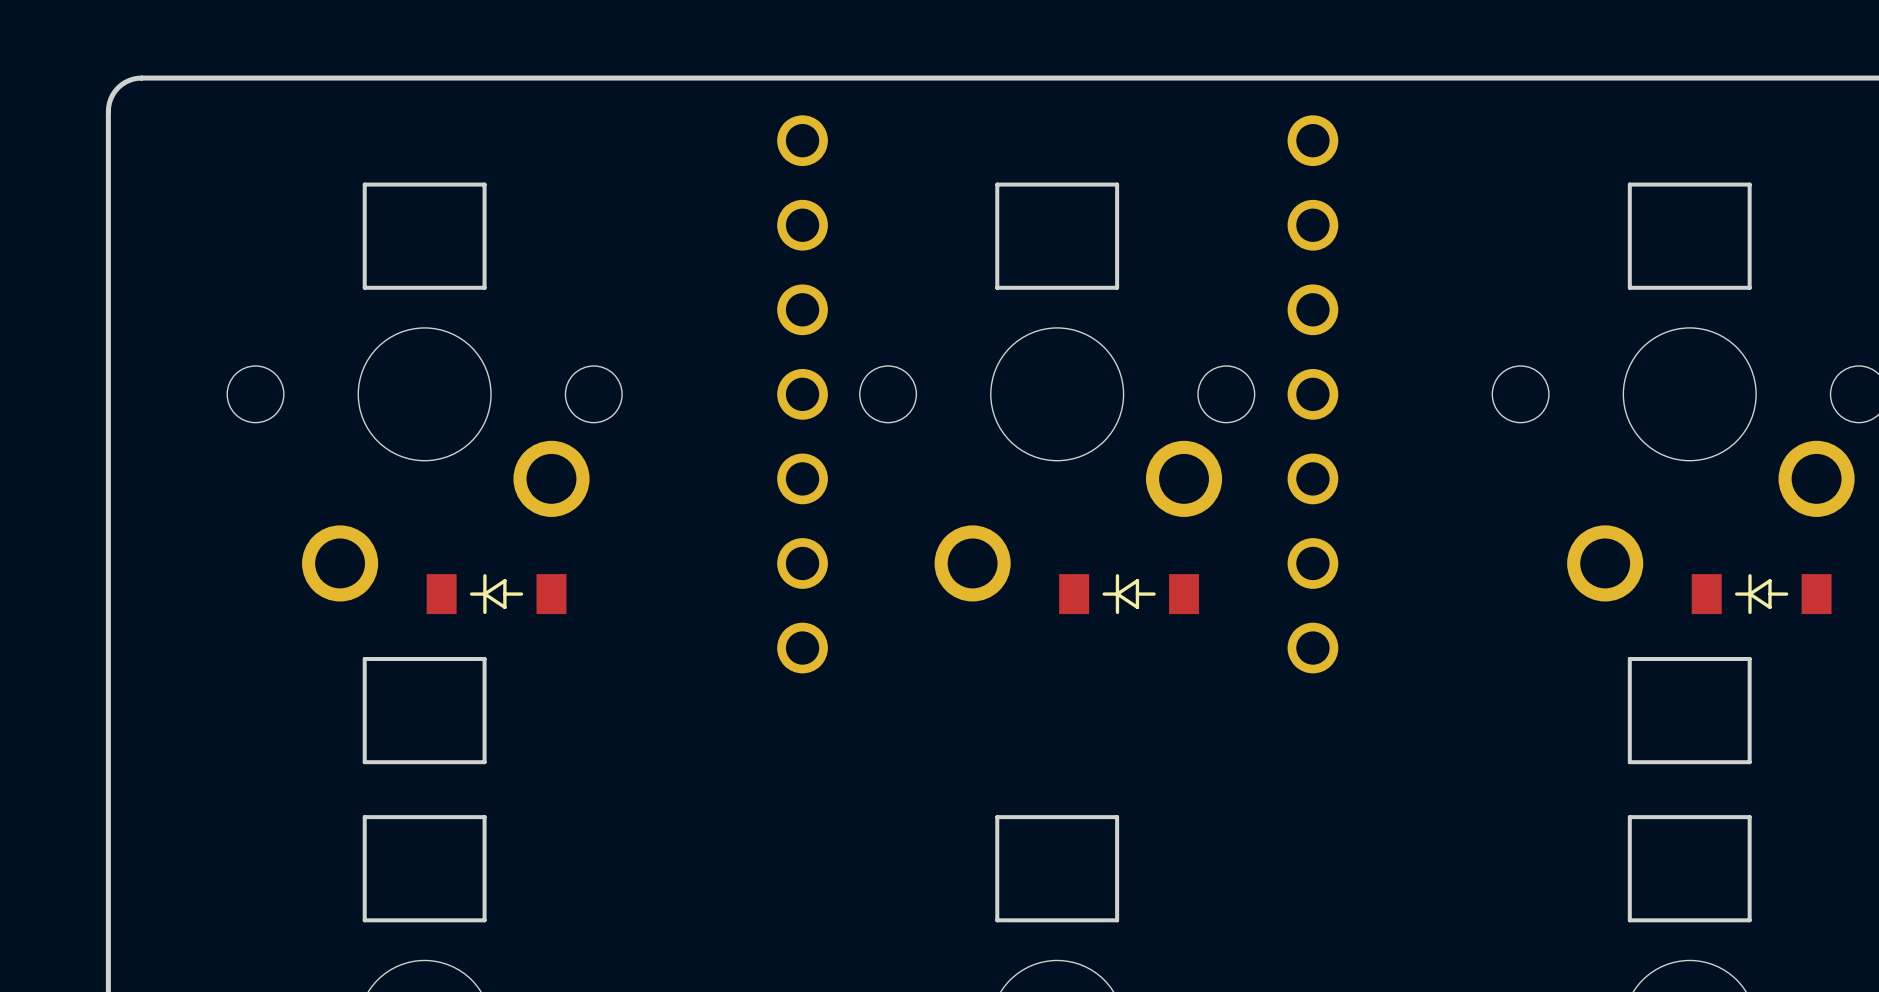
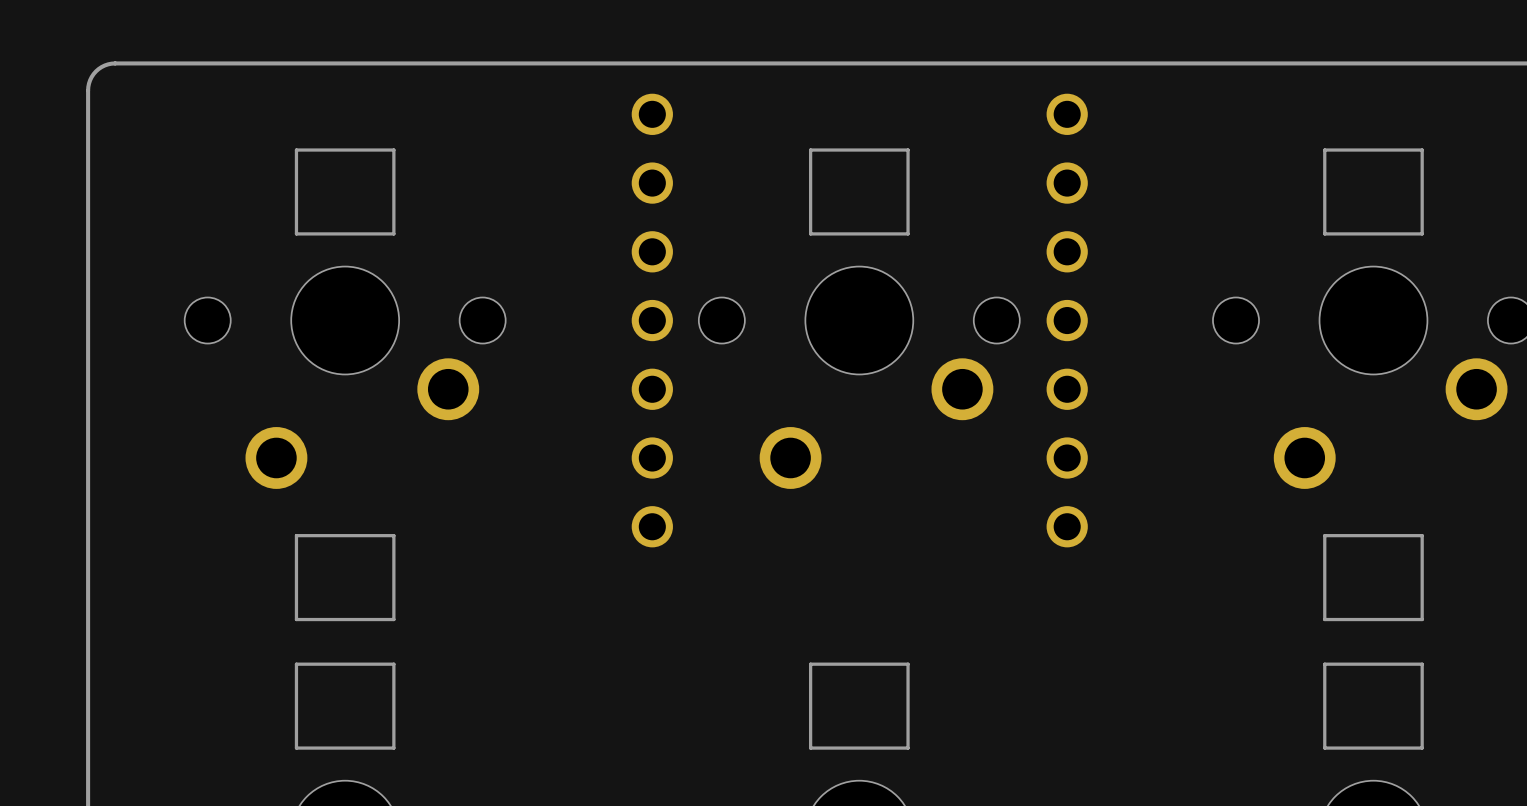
part: (496, 594) -> none
part: (1129, 594) -> none
part: (1761, 594) -> none

